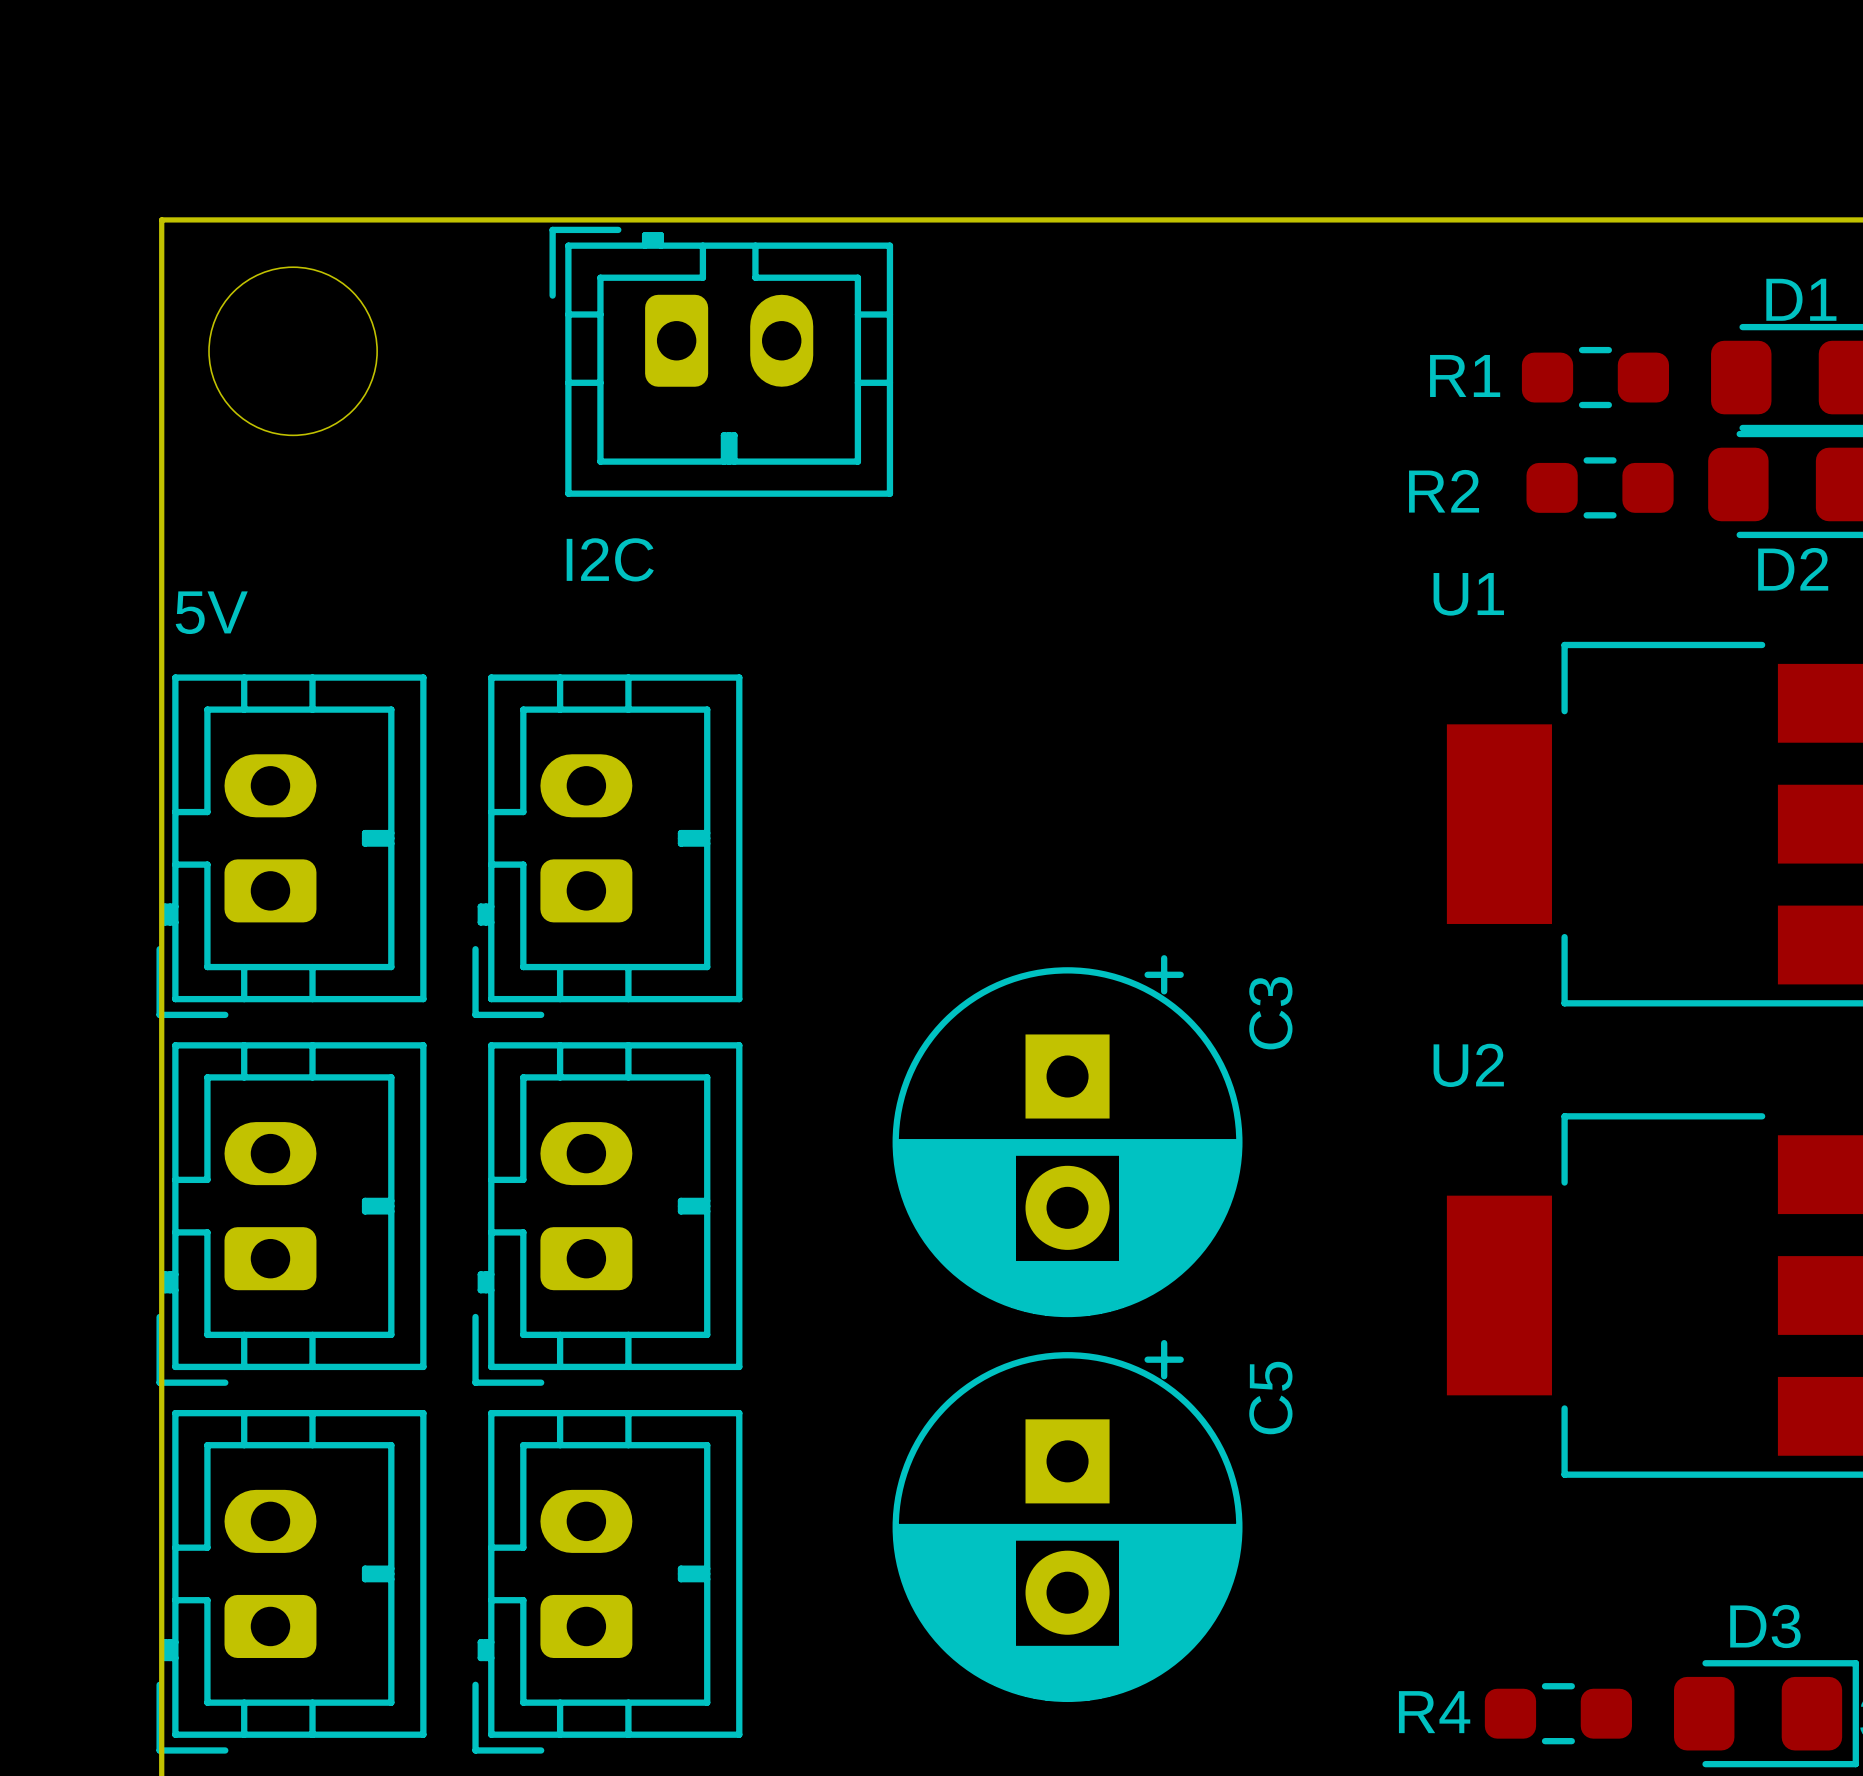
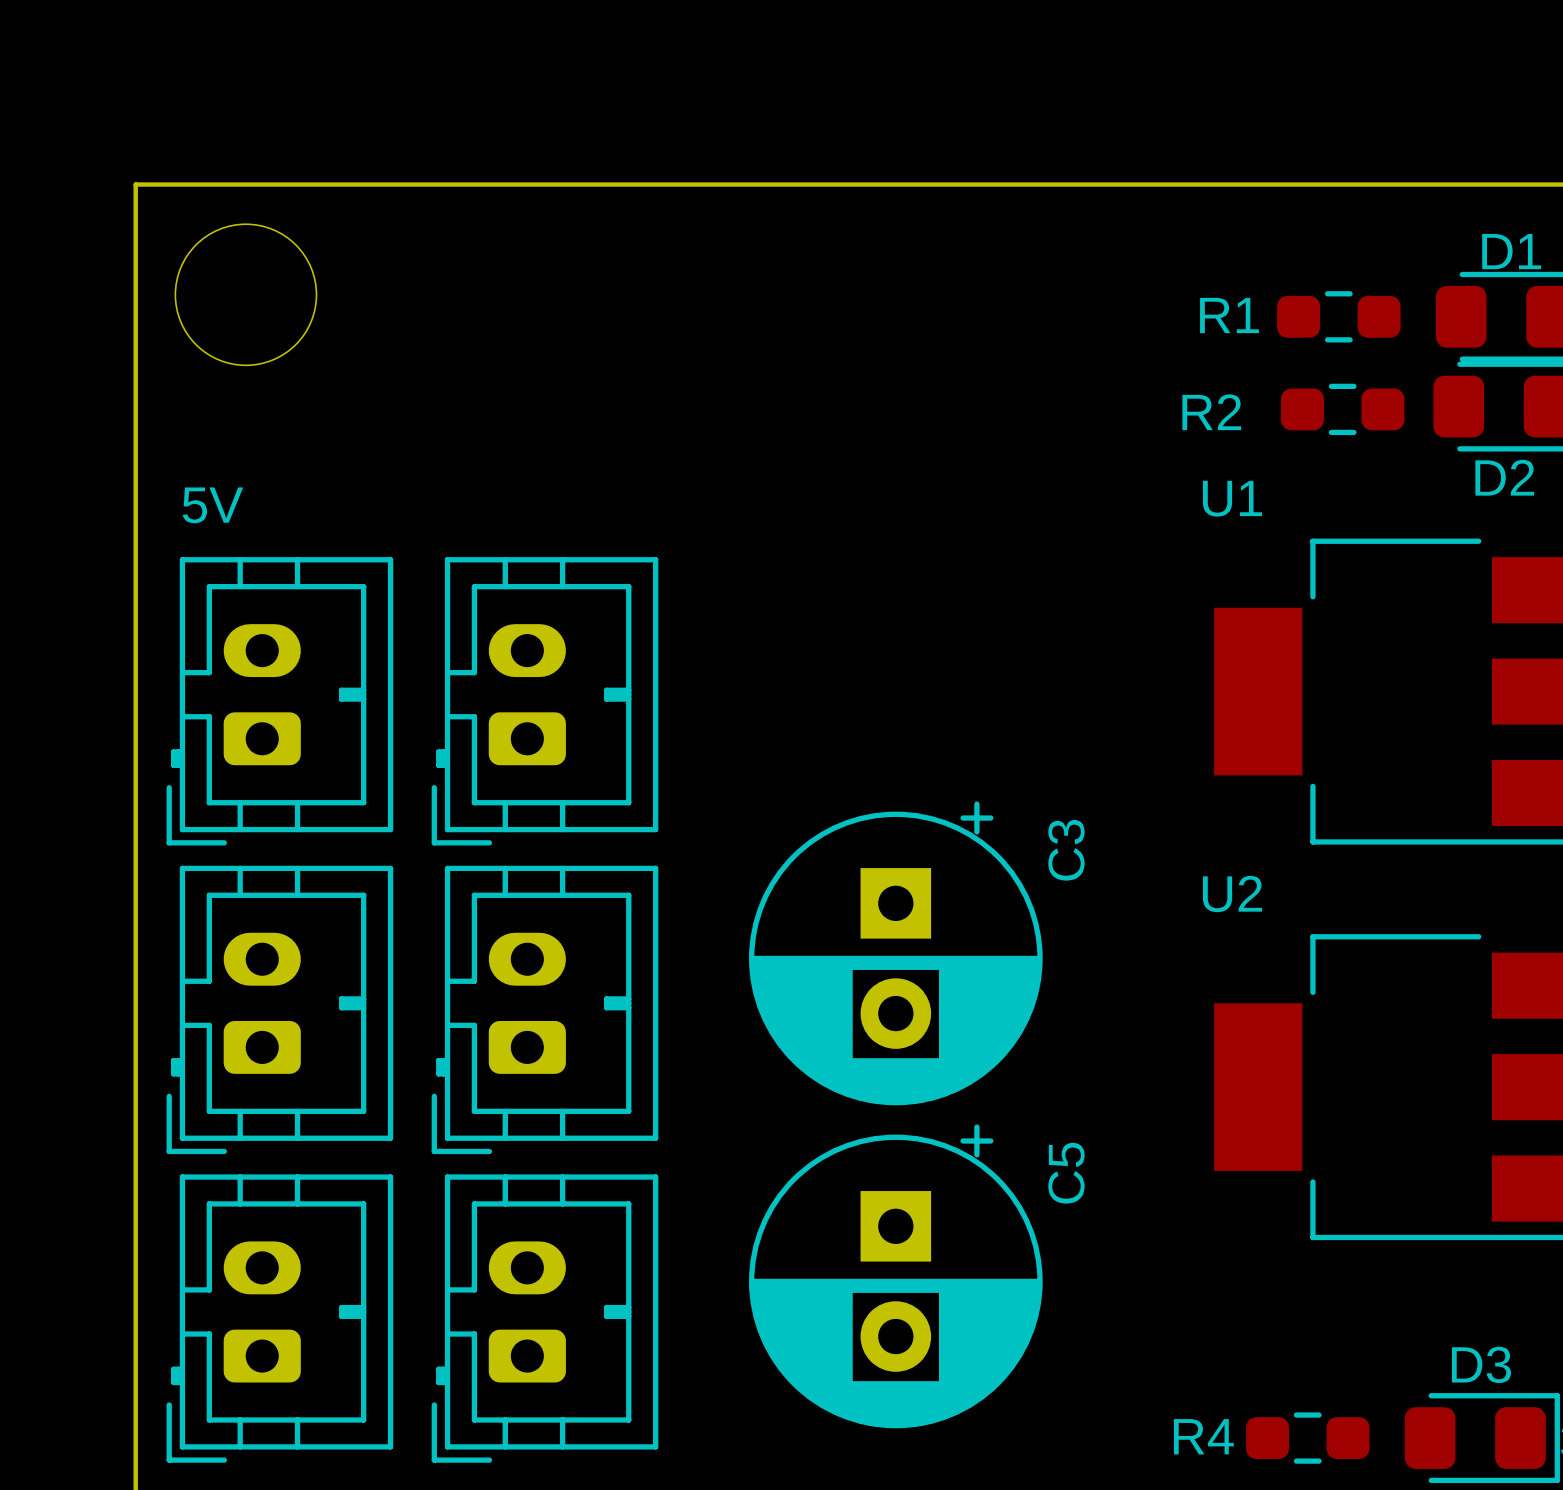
part: (721, 361) -> none
text: I2C (610, 559) -> none
text position: 5V (211, 612) -> 5V (212, 505)
part footprint: [472, 674, 743, 1019] -> [431, 557, 659, 846]
part position: (291, 846) -> (279, 701)
part footprint: [472, 1042, 743, 1386] -> [431, 865, 659, 1155]
part position: (291, 1214) -> (279, 1009)
part footprint: [472, 1410, 743, 1754] -> [431, 1174, 659, 1463]
part position: (291, 1581) -> (279, 1318)

